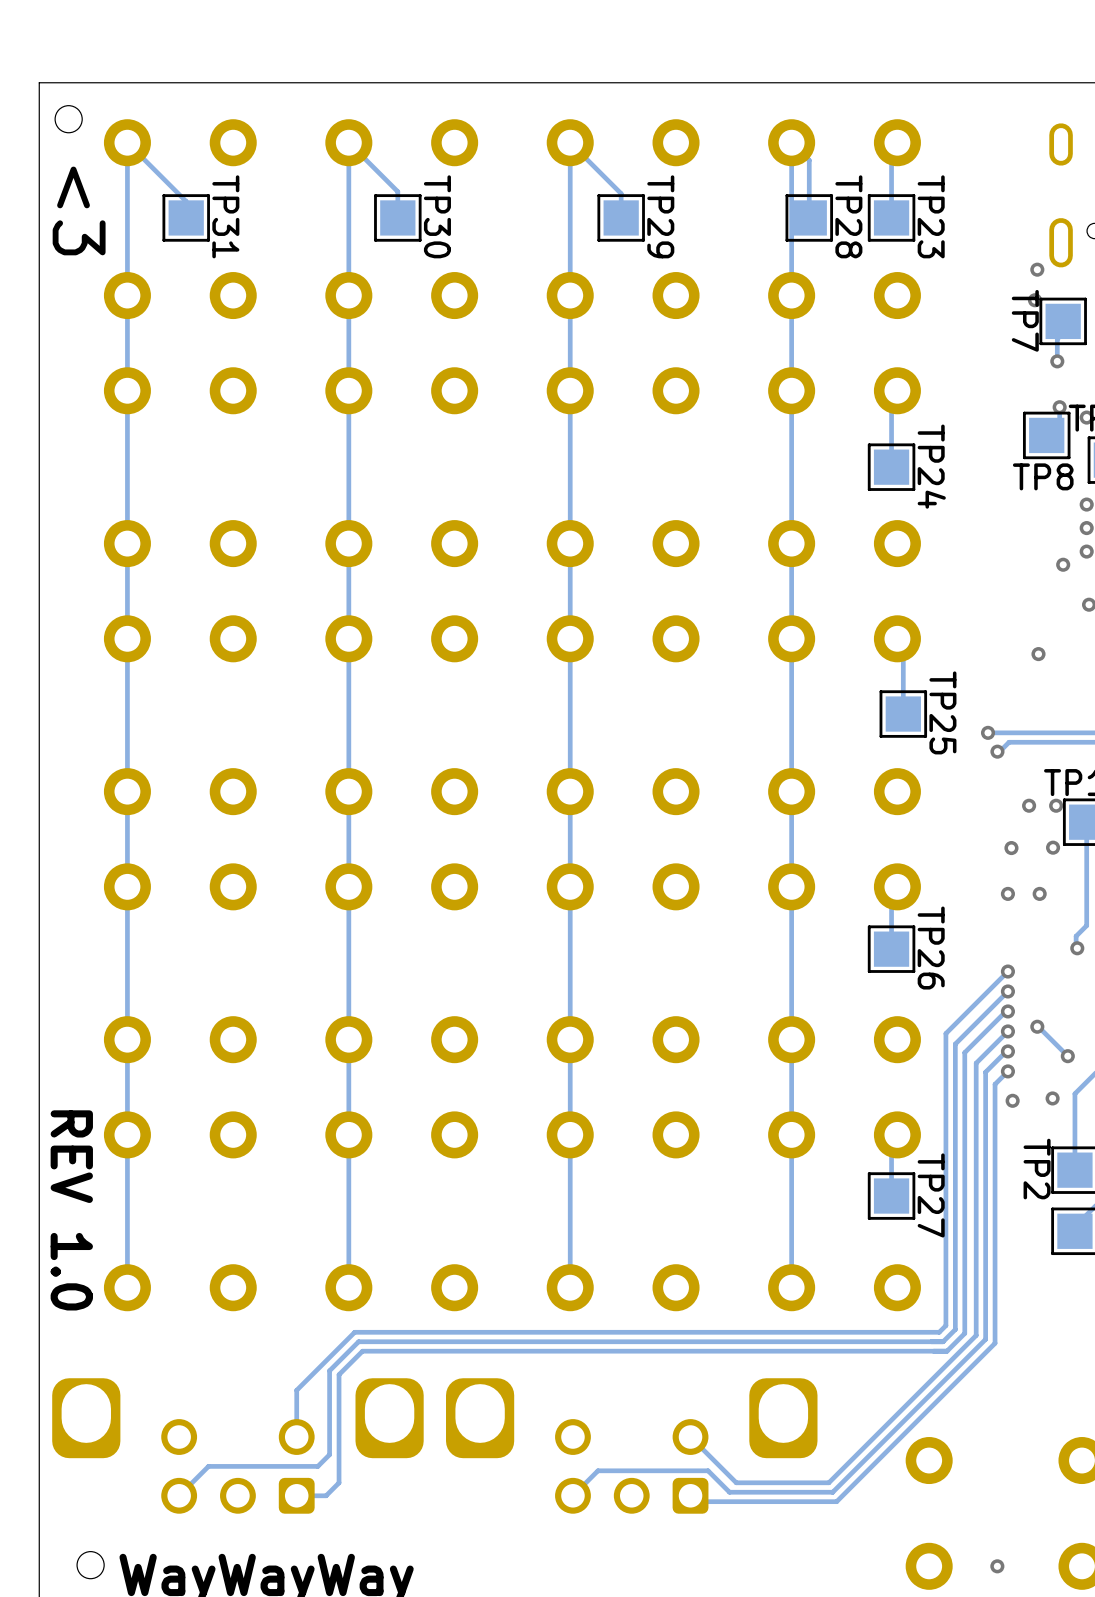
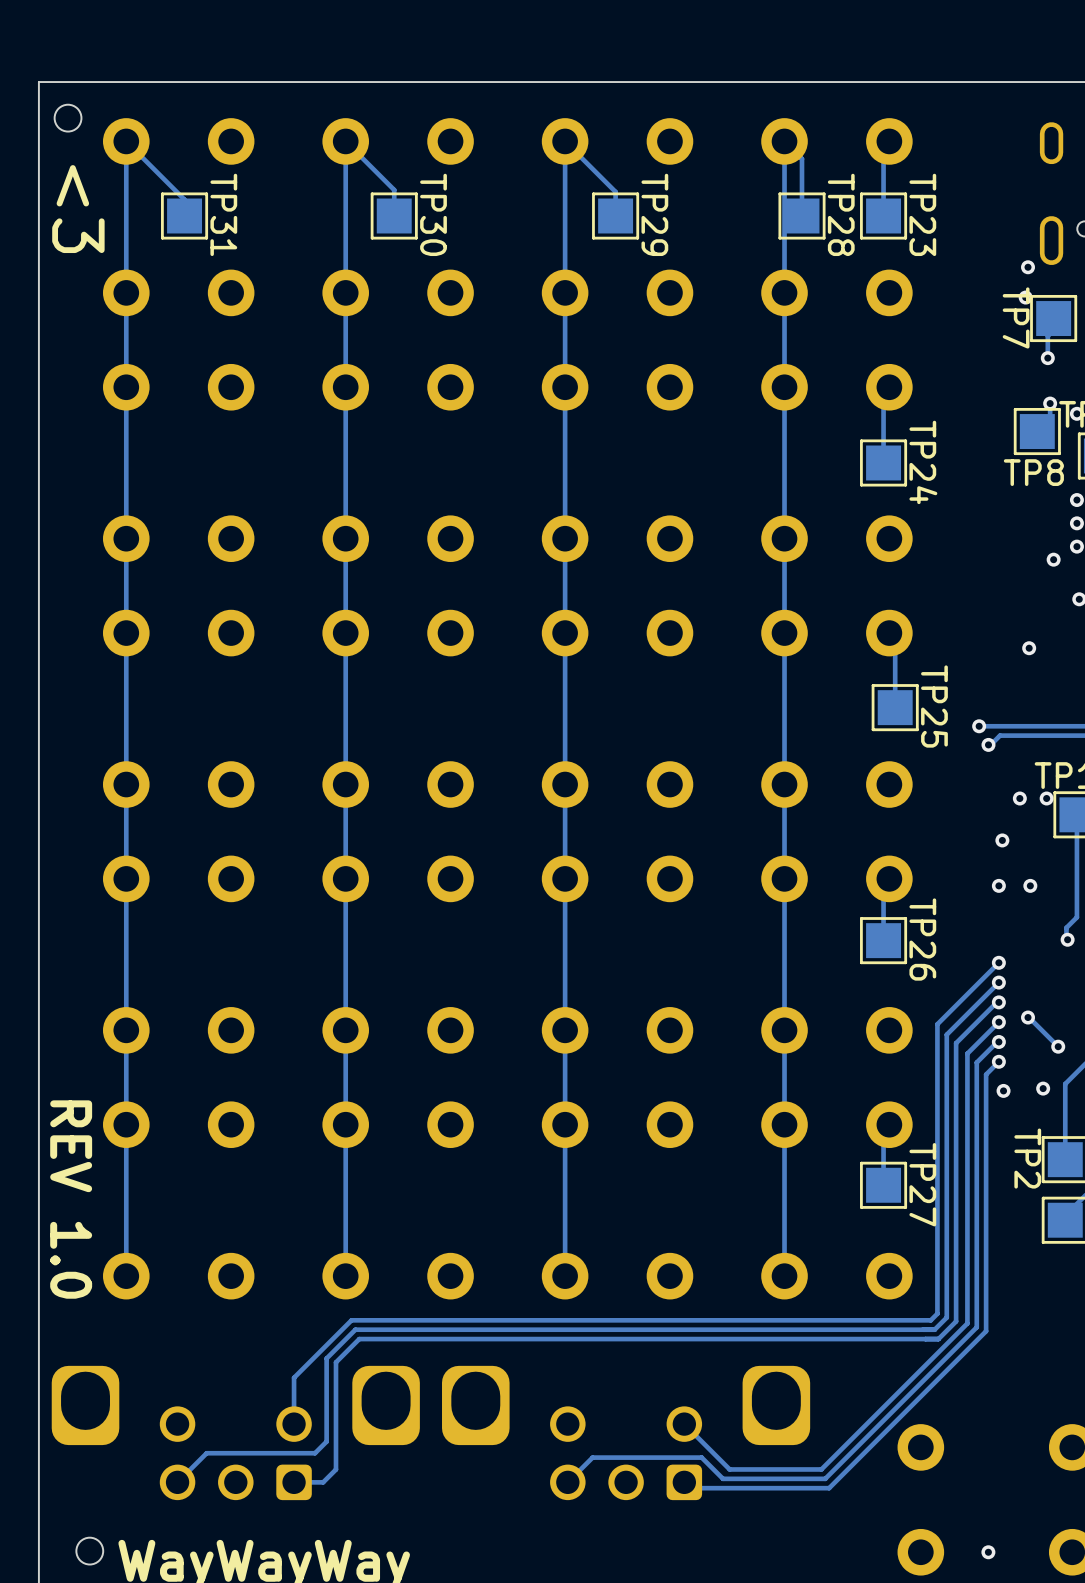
via: (1053, 847) -> none

